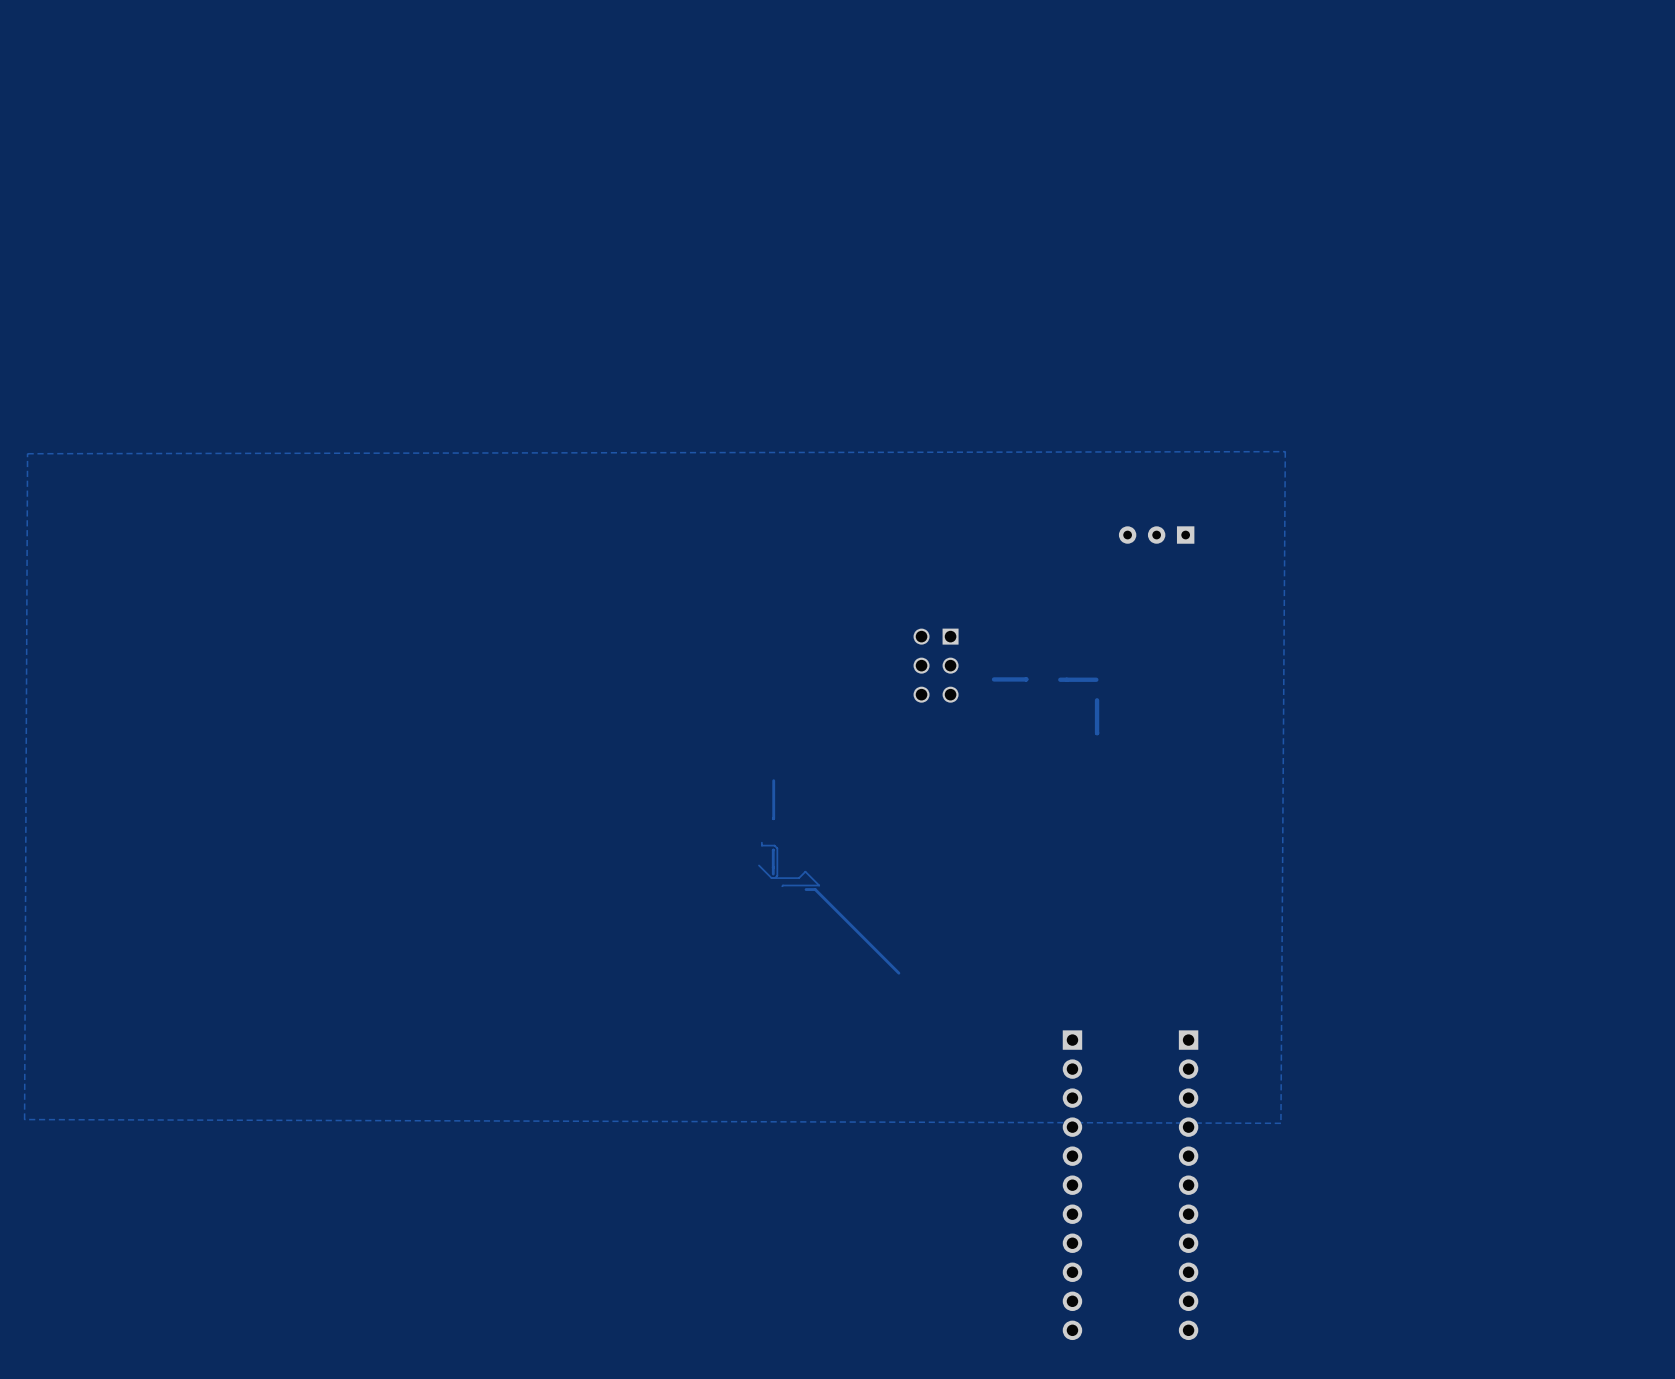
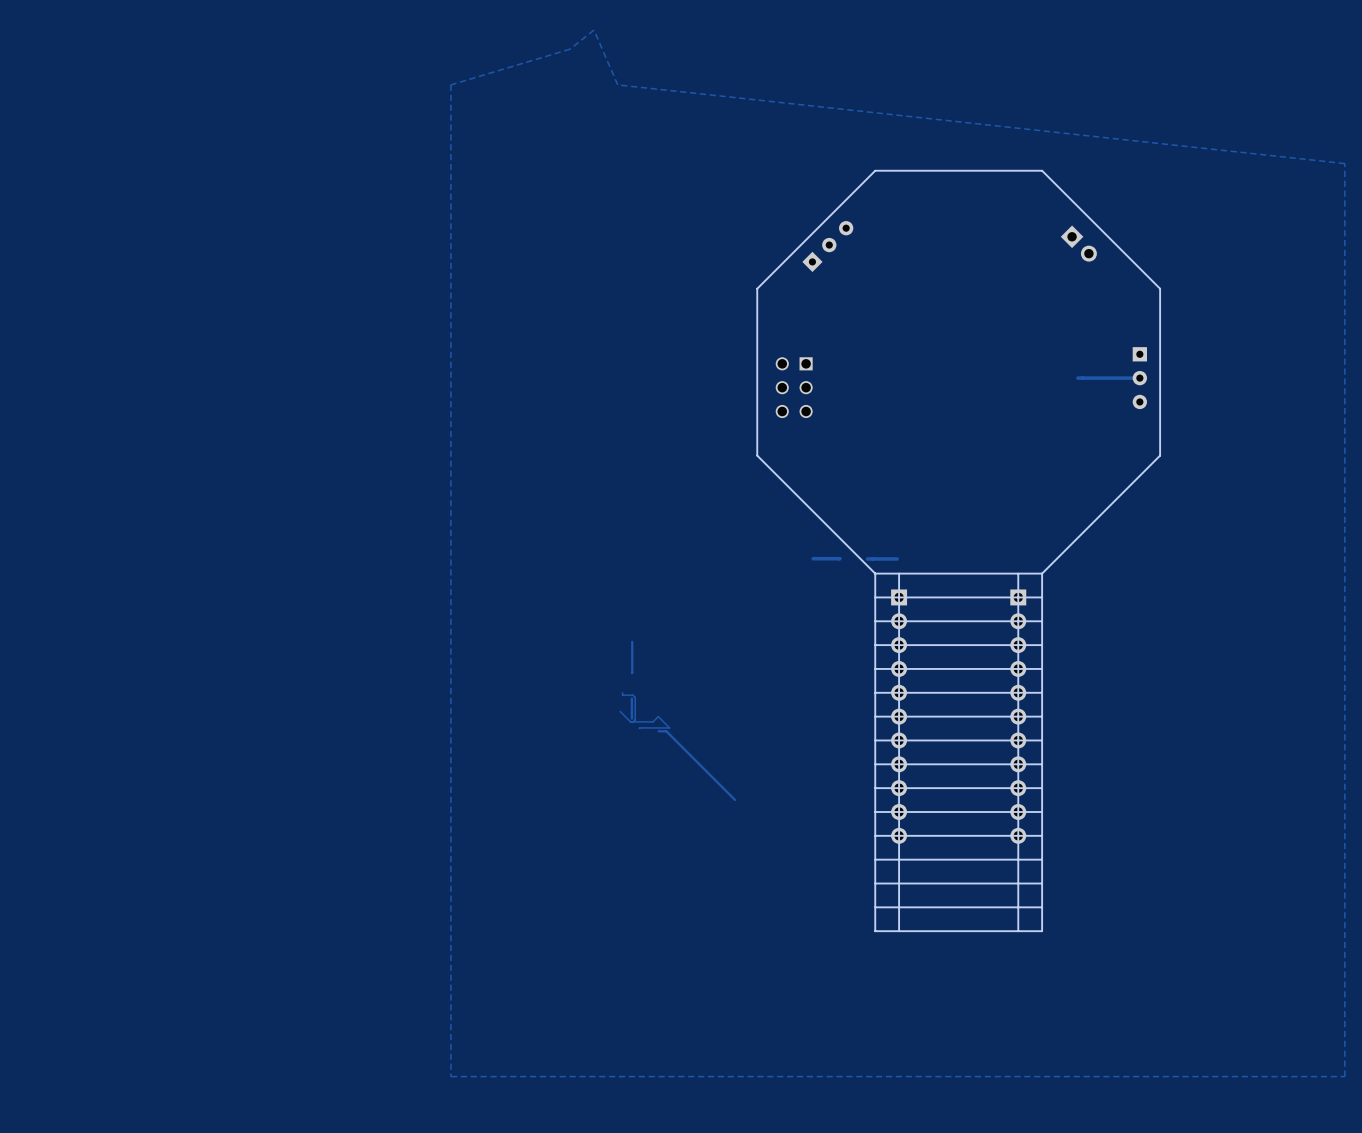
zone outline: none -> (593, 30) (617, 84) (1344, 163) (1344, 1076) (450, 1076) (450, 84) (570, 49) (593, 30)
part: none -> (1078, 243)
part: none -> (827, 246)
zone outline: (1285, 451) (1280, 1123) (24, 1119) (27, 453) (1285, 451) -> none
track: none -> (1139, 378) (1077, 378)
part rotation: 0° (1156, 535) -> 90° counterclockwise (1139, 378)
part position: (1156, 535) -> (1139, 378)
part position: (936, 665) -> (794, 387)
board edge: none -> (899, 573) (899, 931)
board edge: none -> (1018, 573) (1018, 931)
board edge: none -> (1042, 573) (1042, 931) (875, 931) (875, 573)
board edge: none -> (1042, 573) (1160, 455) (1160, 288) (1042, 170) (875, 170) (757, 288) (757, 455) (875, 573)
board edge: none -> (1042, 573) (875, 573)
track: (1097, 700) (1097, 733) -> none
board edge: none -> (1042, 597) (875, 597)
board edge: none -> (1042, 621) (875, 621)
board edge: none -> (1042, 645) (875, 645)
board edge: none -> (1042, 668) (875, 668)
board edge: none -> (1042, 692) (875, 692)
part: none -> (899, 716)
part: none -> (1018, 716)
board edge: none -> (1042, 716) (875, 716)
board edge: none -> (1042, 740) (875, 740)
board edge: none -> (1042, 764) (875, 764)
board edge: none -> (1042, 788) (875, 788)
board edge: none -> (1042, 811) (875, 811)
board edge: none -> (1042, 835) (875, 835)
board edge: none -> (1042, 859) (875, 859)
board edge: none -> (1042, 883) (875, 883)
board edge: none -> (1042, 907) (875, 907)
part: (1072, 1185) -> none
part: (1188, 1185) -> none

